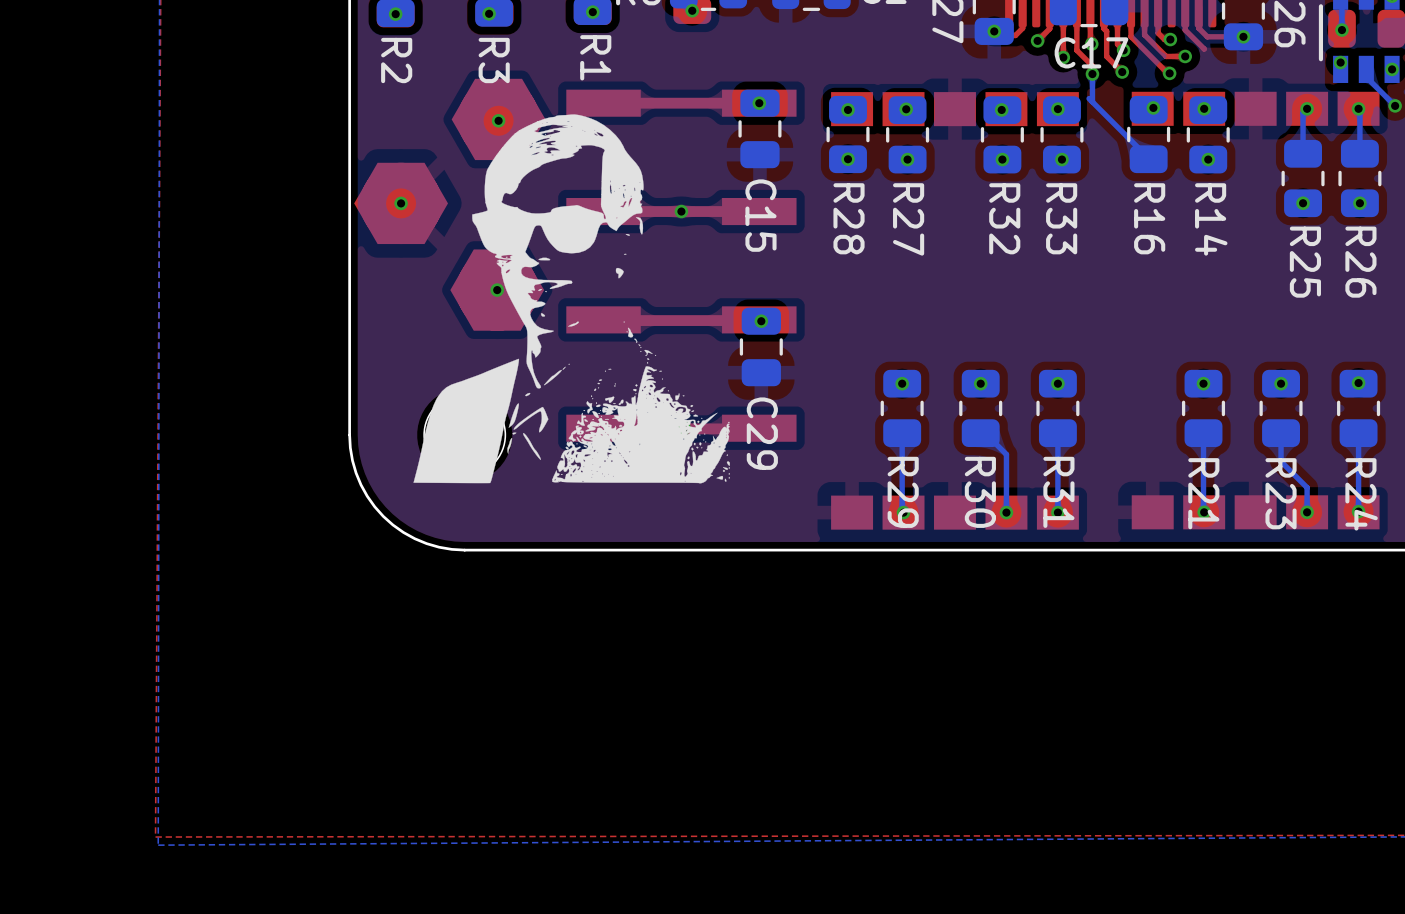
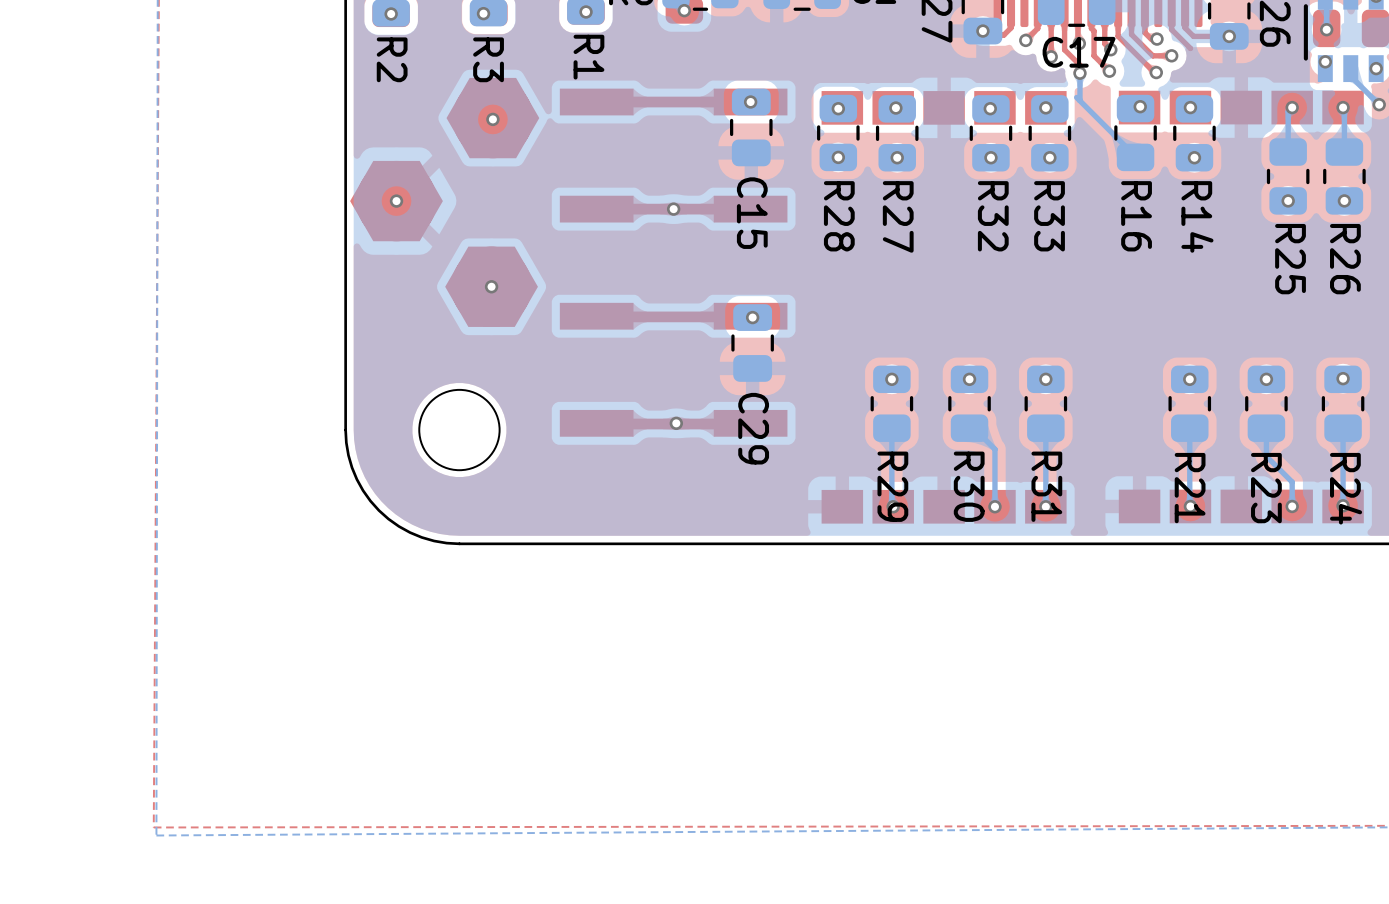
drawing: [413, 114, 730, 484] -> none

